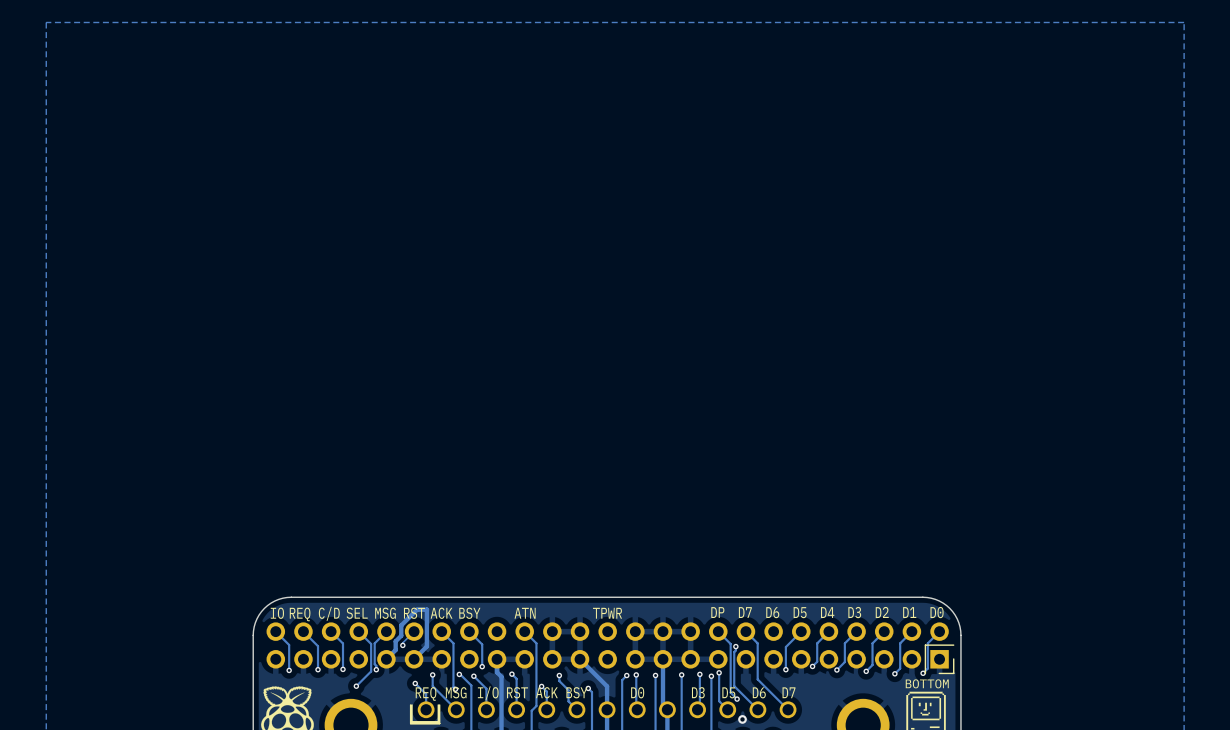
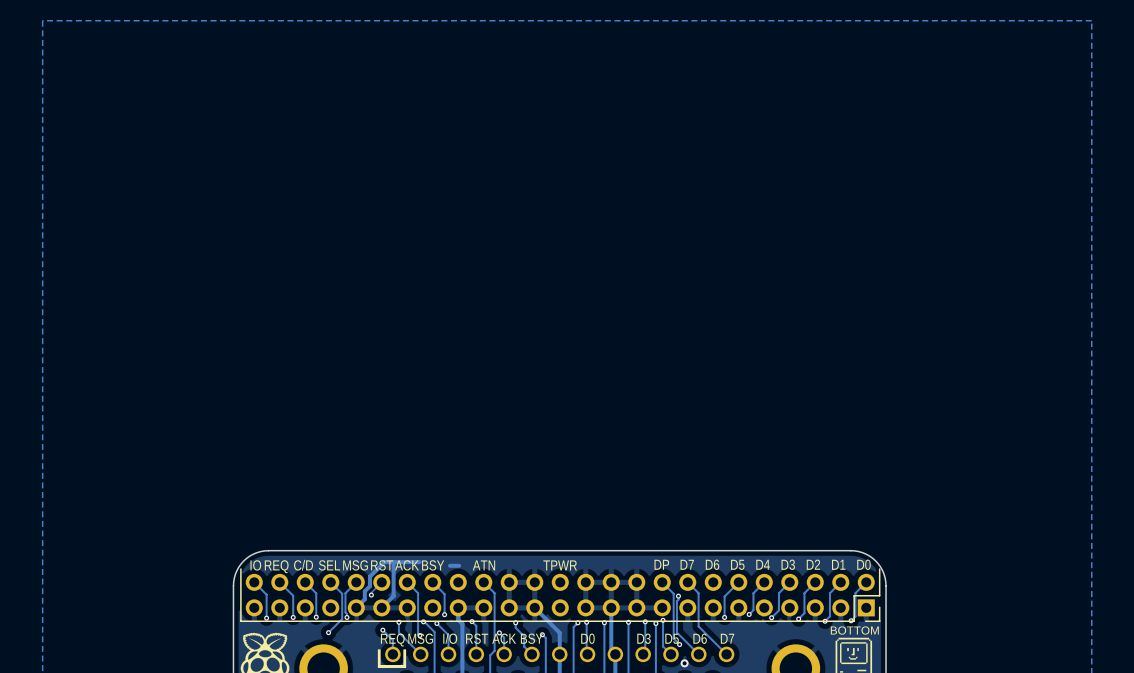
track: none -> (419, 562) (393, 562)
track: none -> (459, 565) (450, 565)
line: none -> (879, 568) (879, 595) (854, 595) (854, 621) (240, 621) (240, 568)
part footprint: [266, 622, 955, 675] -> [245, 573, 875, 617]
line: none -> (879, 607) (879, 621) (865, 621)

